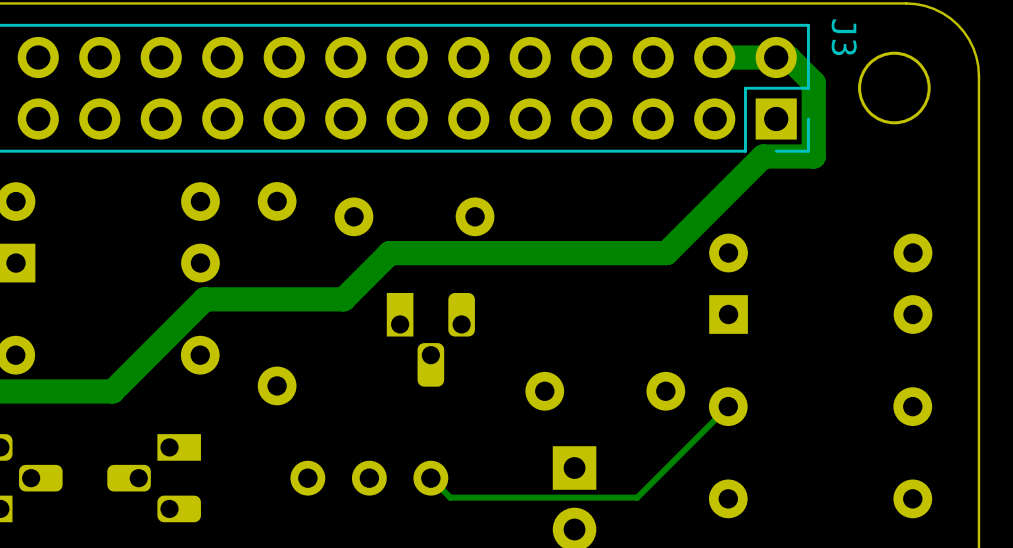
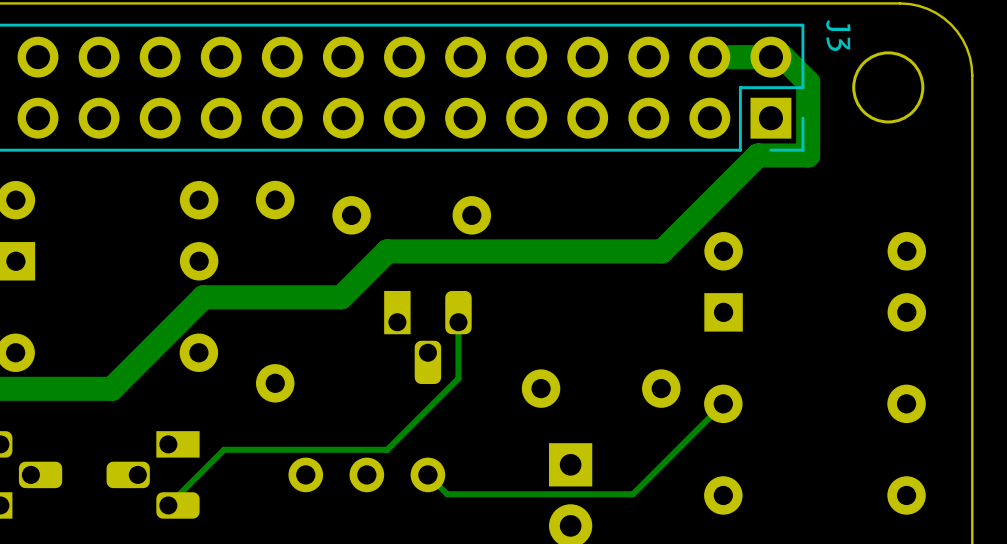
track: none -> (458, 322) (458, 378) (387, 449) (224, 449) (168, 505)

